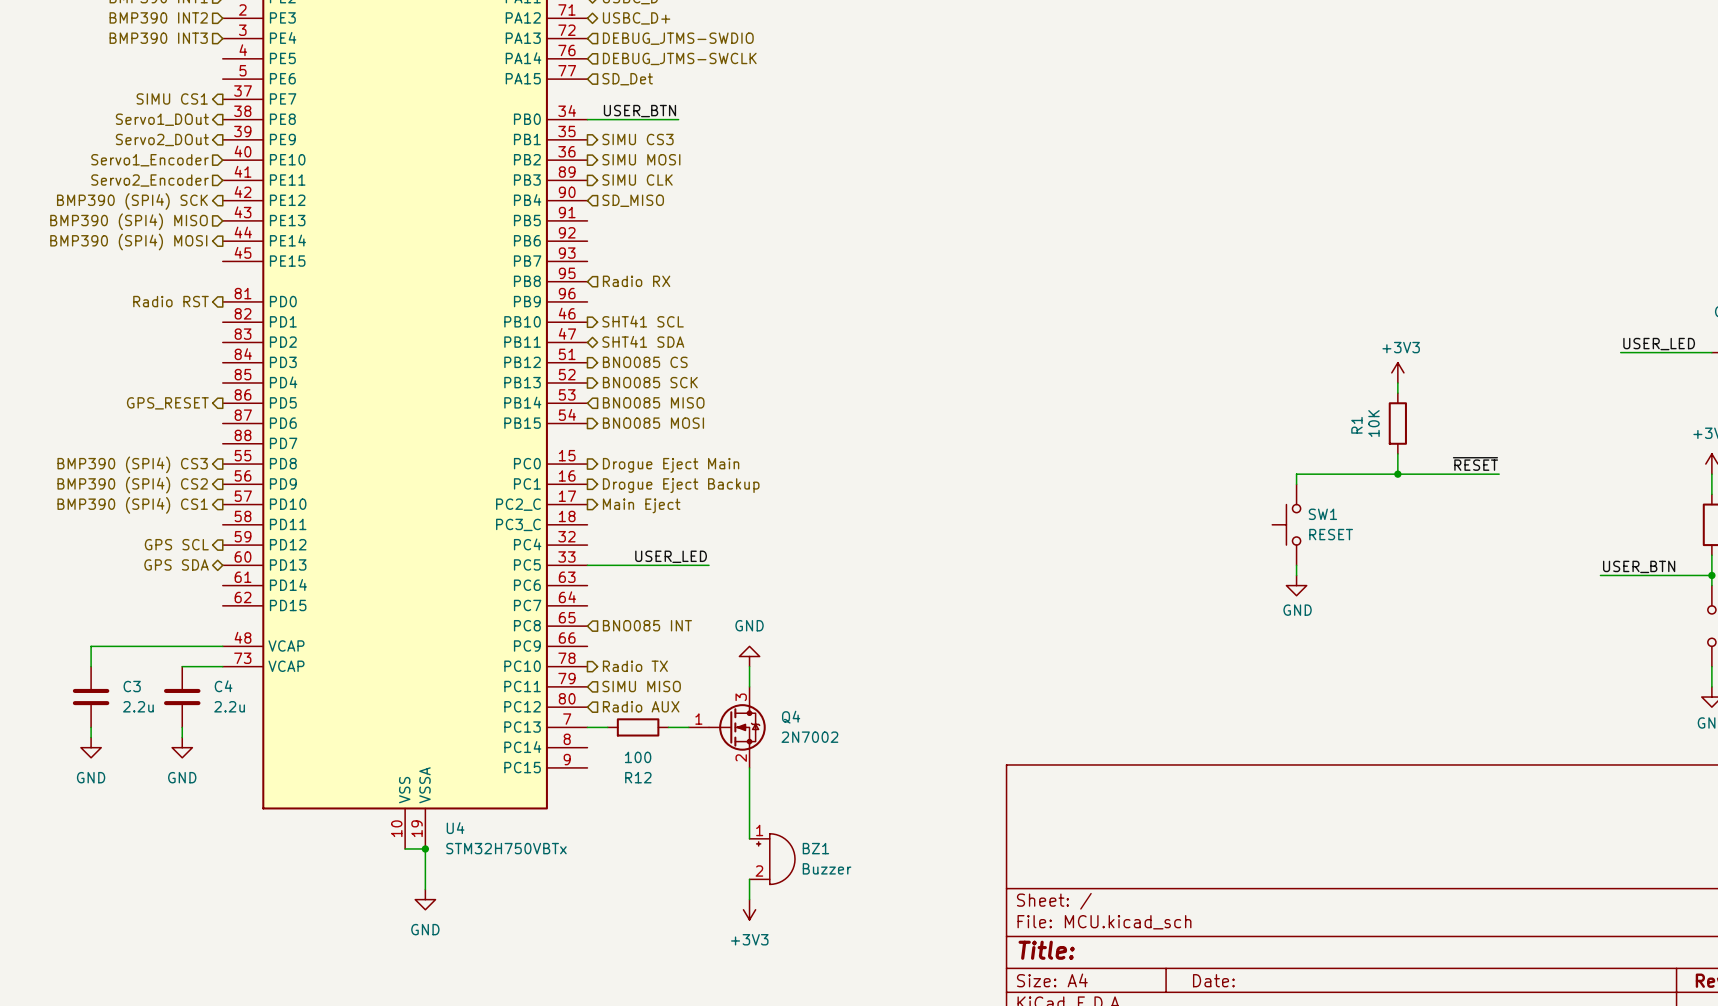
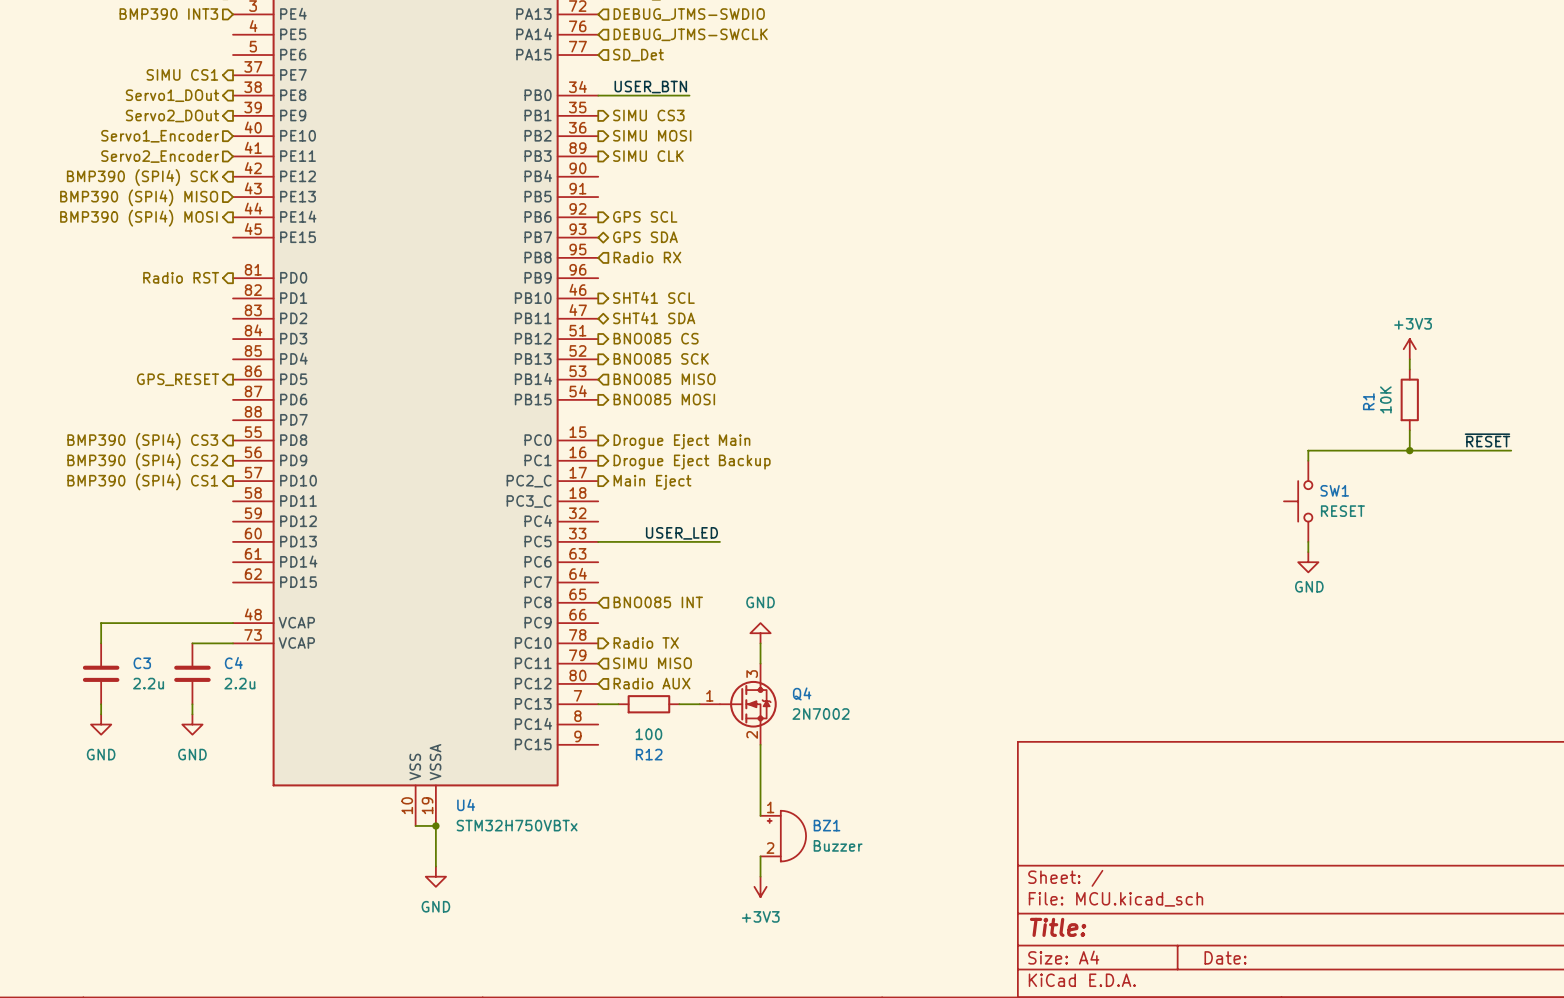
hierarchical label: SD_MISO (633, 200) -> none
hierarchical label: none -> GPS SCL (645, 216)
hierarchical label: none -> GPS SDA (645, 237)
hierarchical label: GPS SCL (176, 544) -> none
hierarchical label: GPS SDA (176, 564) -> none

